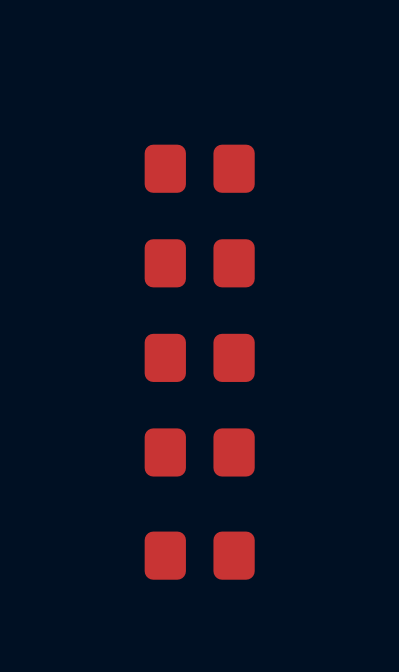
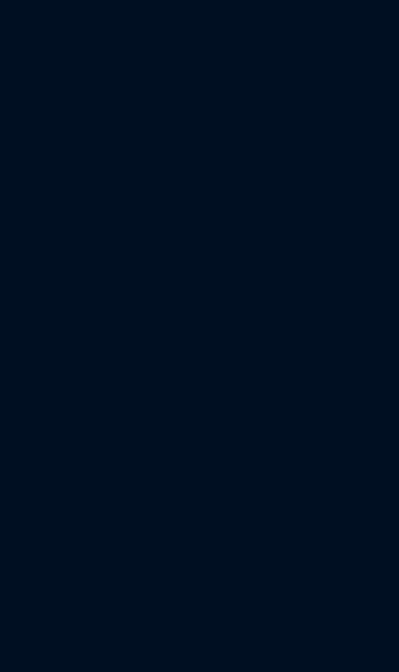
part: (199, 168) -> none
part: (199, 263) -> none
part: (199, 357) -> none
part: (199, 452) -> none
part: (199, 555) -> none

